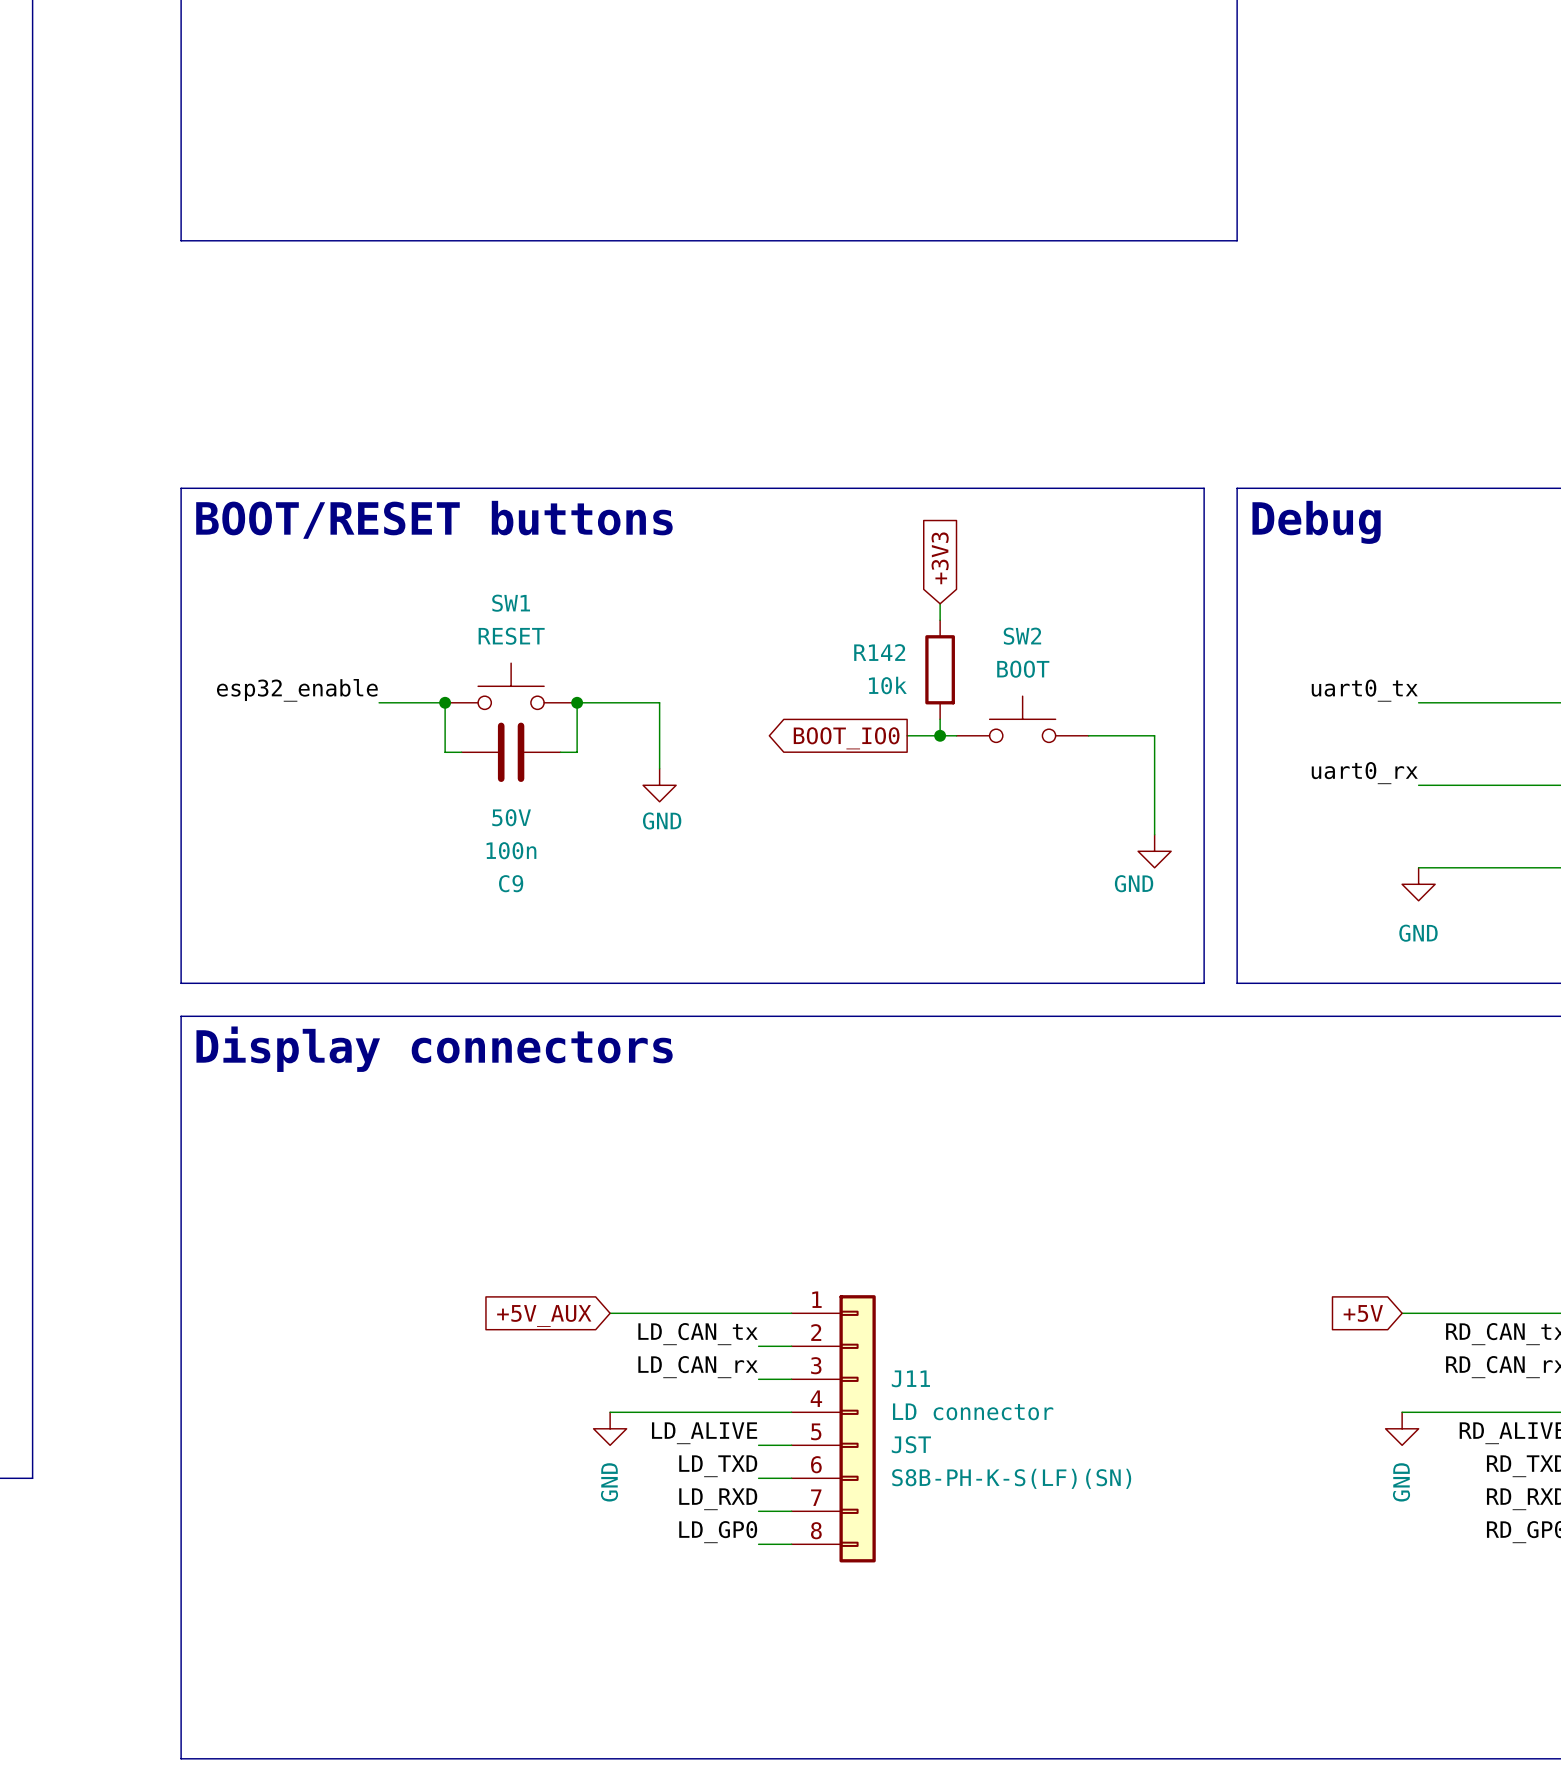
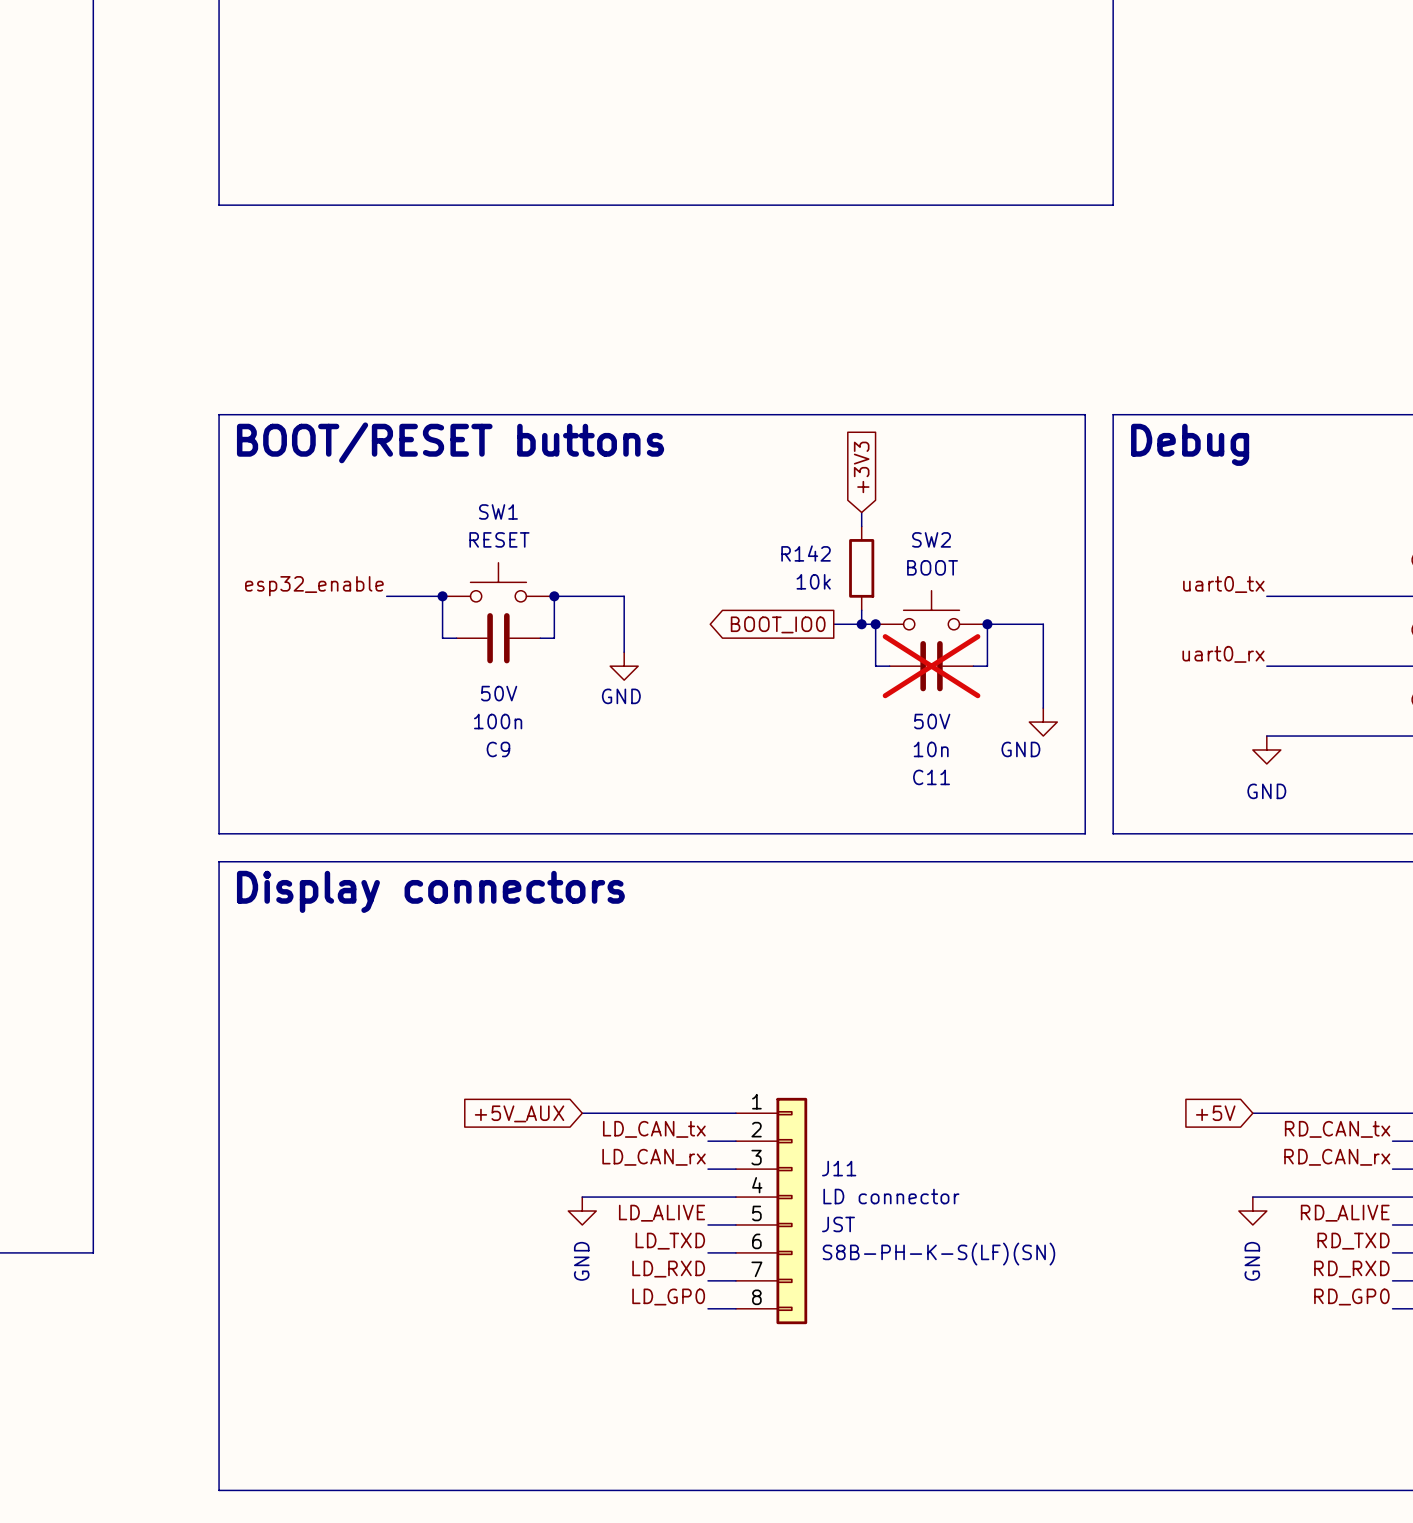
wire: none -> (875, 624) (875, 666) (889, 666)
junction: none -> (875, 624)
wire: none -> (987, 624) (987, 666) (973, 666)
junction: none -> (987, 624)
C11: none -> 10n (931, 666)

